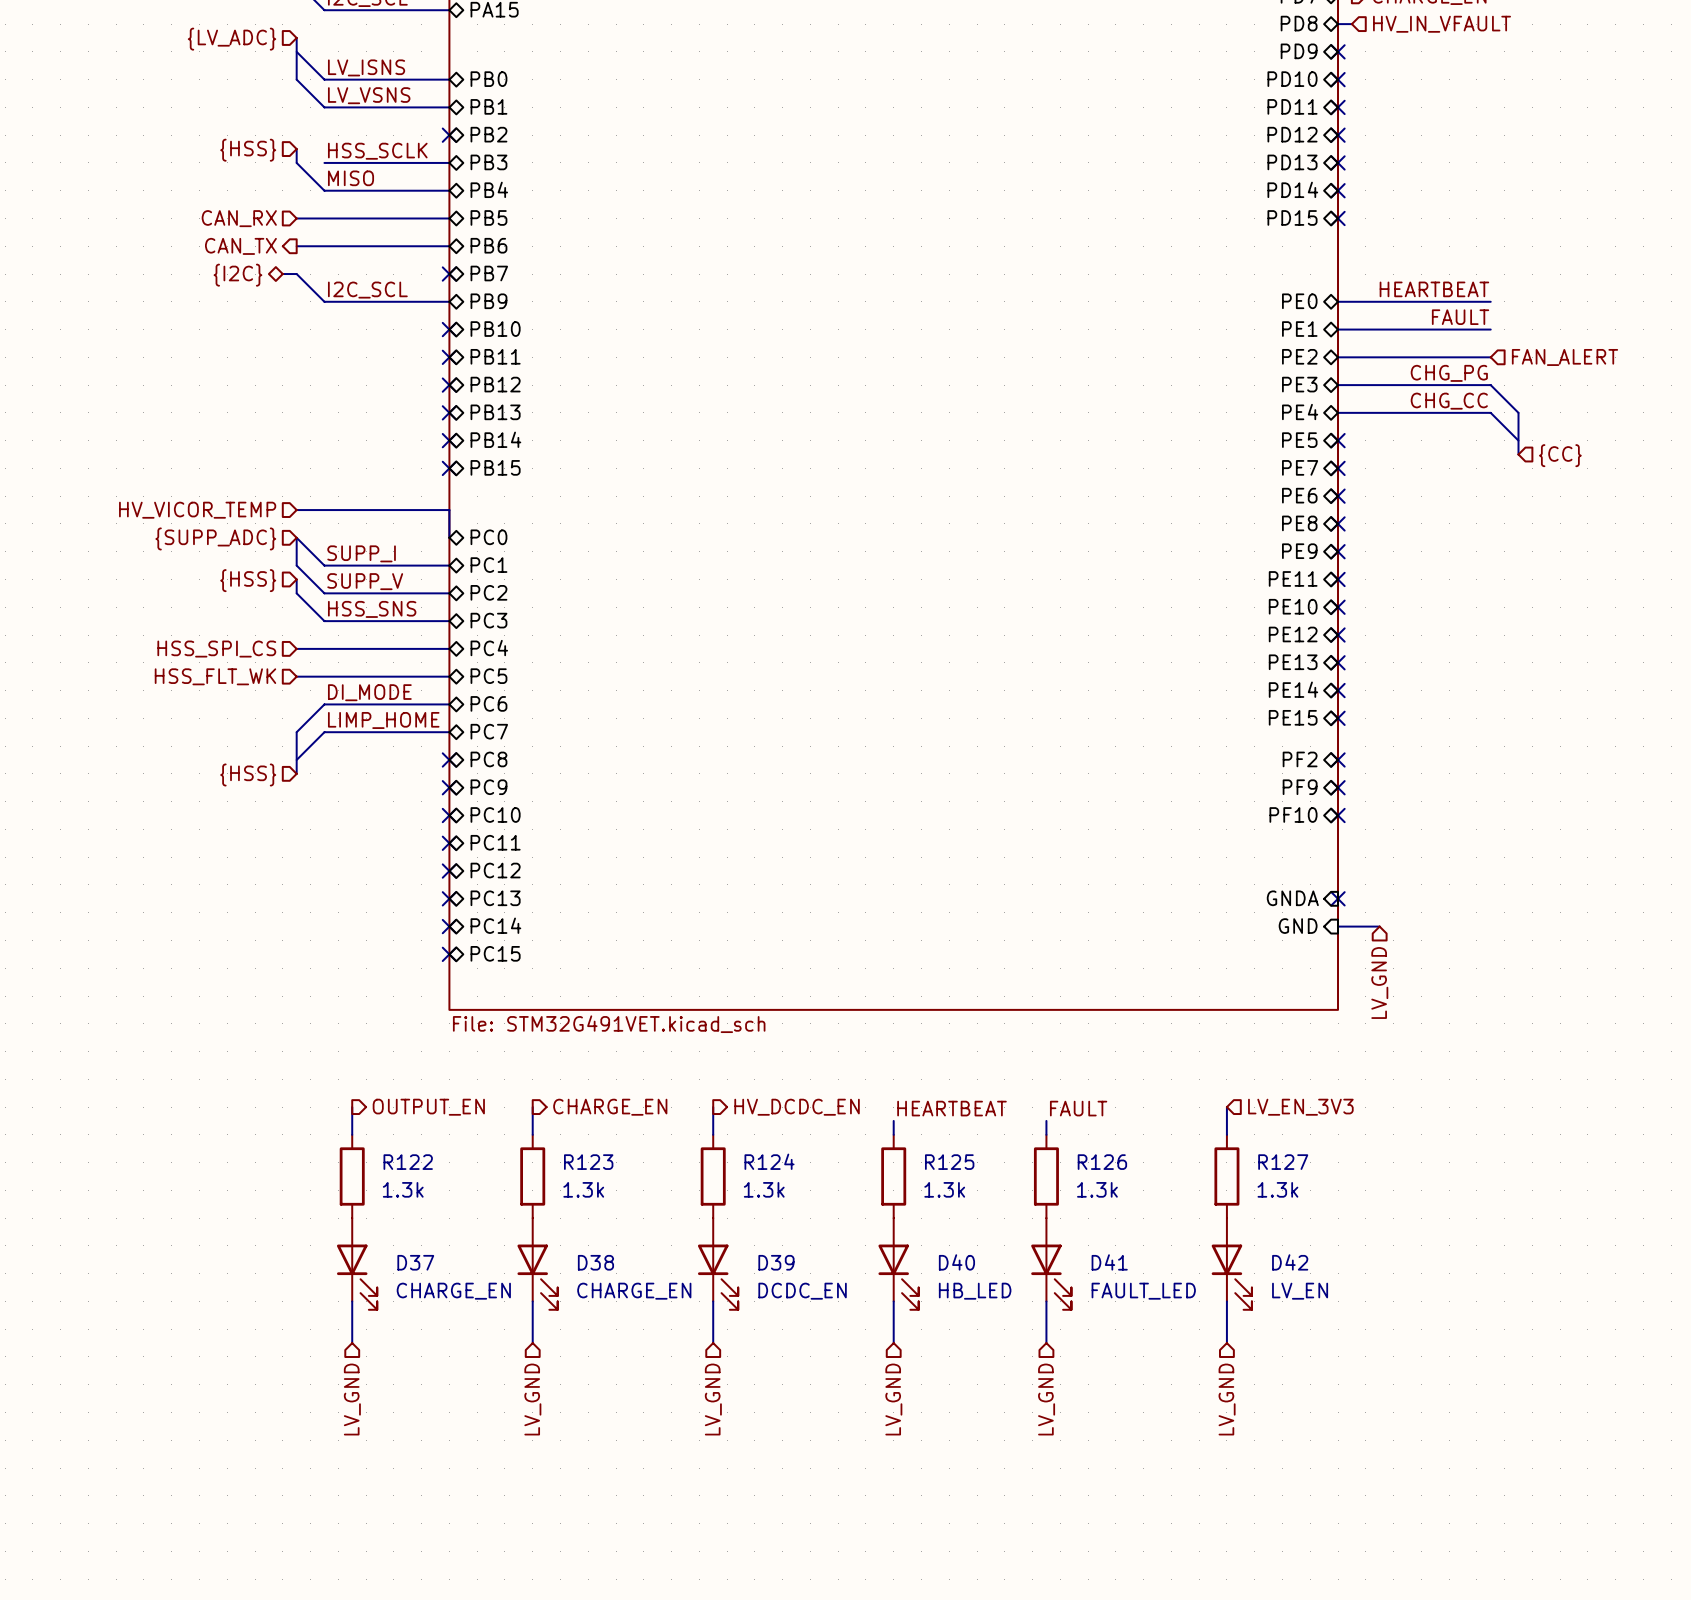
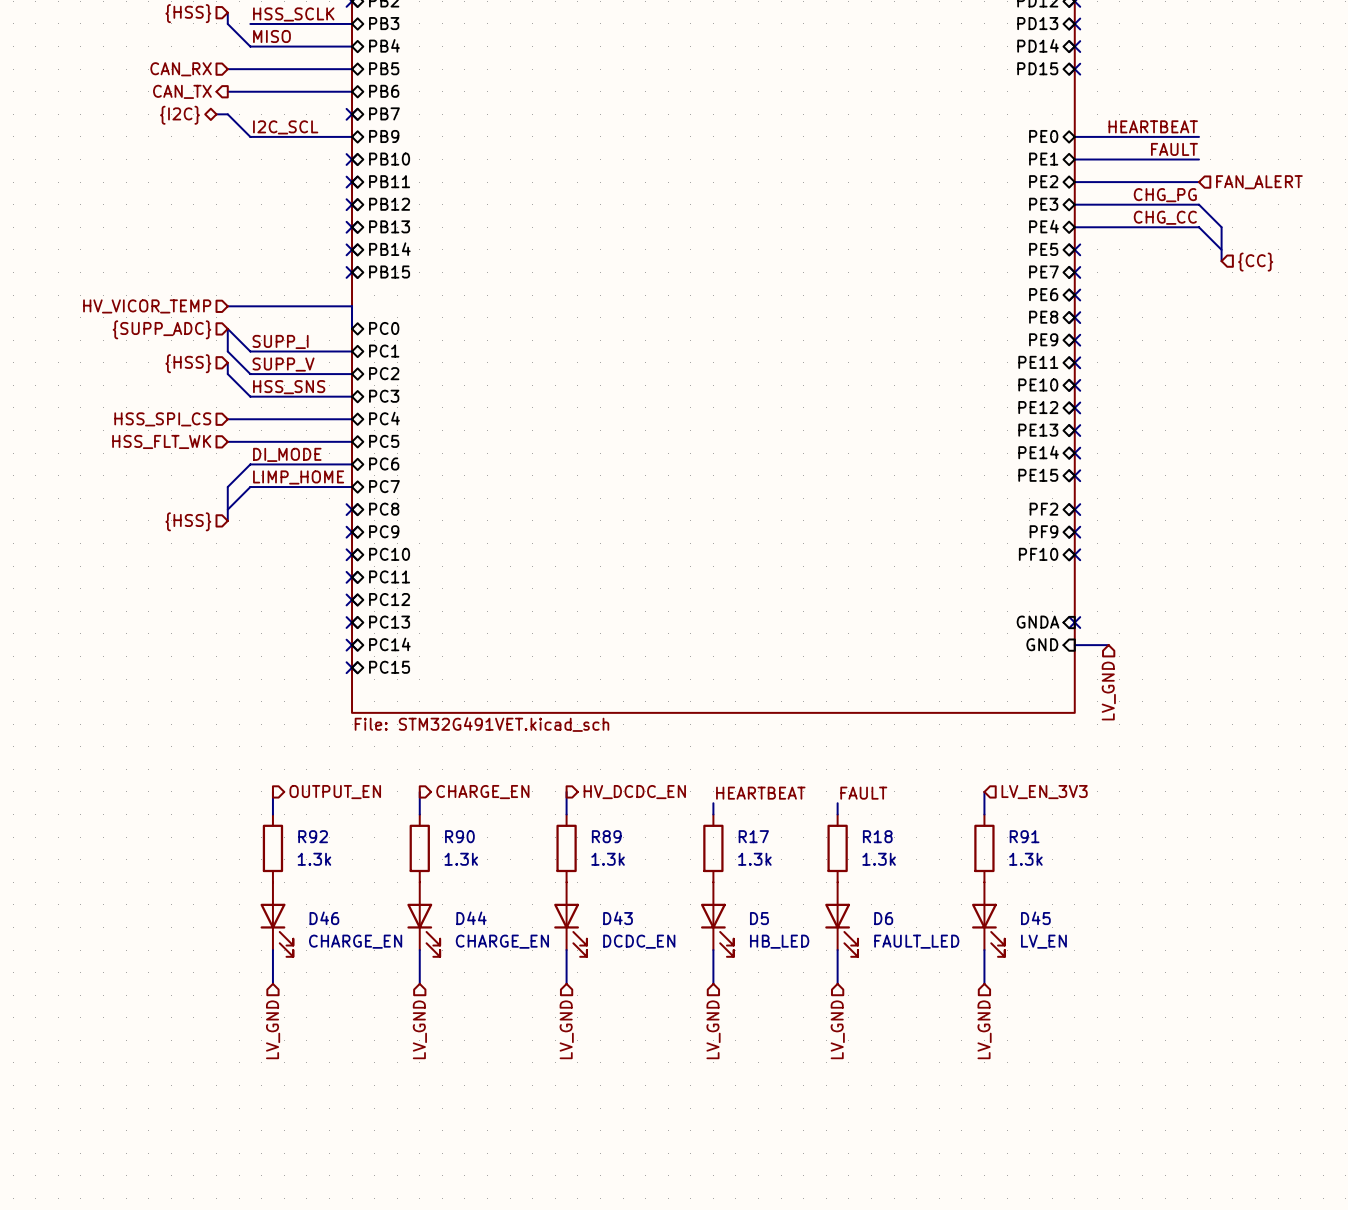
R124 name: R124 (769, 1161) -> R89 (606, 836)
R122 name: R122 (408, 1162) -> R92 (313, 836)
R123 name: R123 (588, 1162) -> R90 (459, 836)
R125 name: R125 (949, 1162) -> R17 (753, 836)
R126 name: R126 (1102, 1162) -> R18 (877, 836)
R127 name: R127 (1283, 1162) -> R91 (1024, 836)
D37 name: D37 (415, 1262) -> D46 (324, 918)
D38 name: D38 (595, 1262) -> D44 (471, 918)
D39 name: D39 (776, 1262) -> D43 (618, 918)
D40 name: D40 (956, 1262) -> D5 (759, 918)
D41 name: D41 (1109, 1262) -> D6 (883, 918)
D42 name: D42 (1290, 1262) -> D45 (1035, 918)

